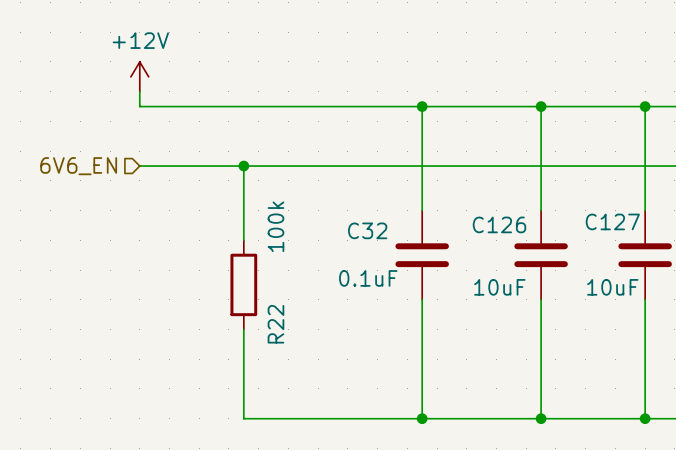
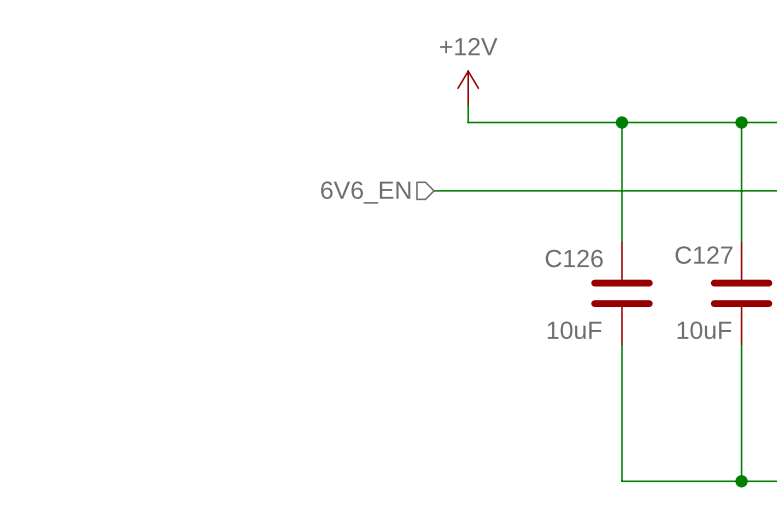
power symbol position: +12V (139, 76) -> +12V (468, 88)
wire: (139, 91) (139, 106) (407, 106) -> (468, 105) (468, 122)
wire: (422, 106) (422, 210) -> none
junction: (422, 106) -> none
hierarchical label position: 6V6_EN (78, 166) -> 6V6_EN (365, 192)
wire: (139, 166) (377, 166) -> none
wire: (243, 166) (243, 240) -> none
junction: (243, 166) -> none
C32: 0.1uF (422, 255) -> none
R22: 100k (243, 284) -> none
wire: (422, 299) (422, 418) -> none
wire: (243, 329) (243, 418) (541, 418) -> none
junction: (422, 418) -> none
junction: (541, 418) -> none

